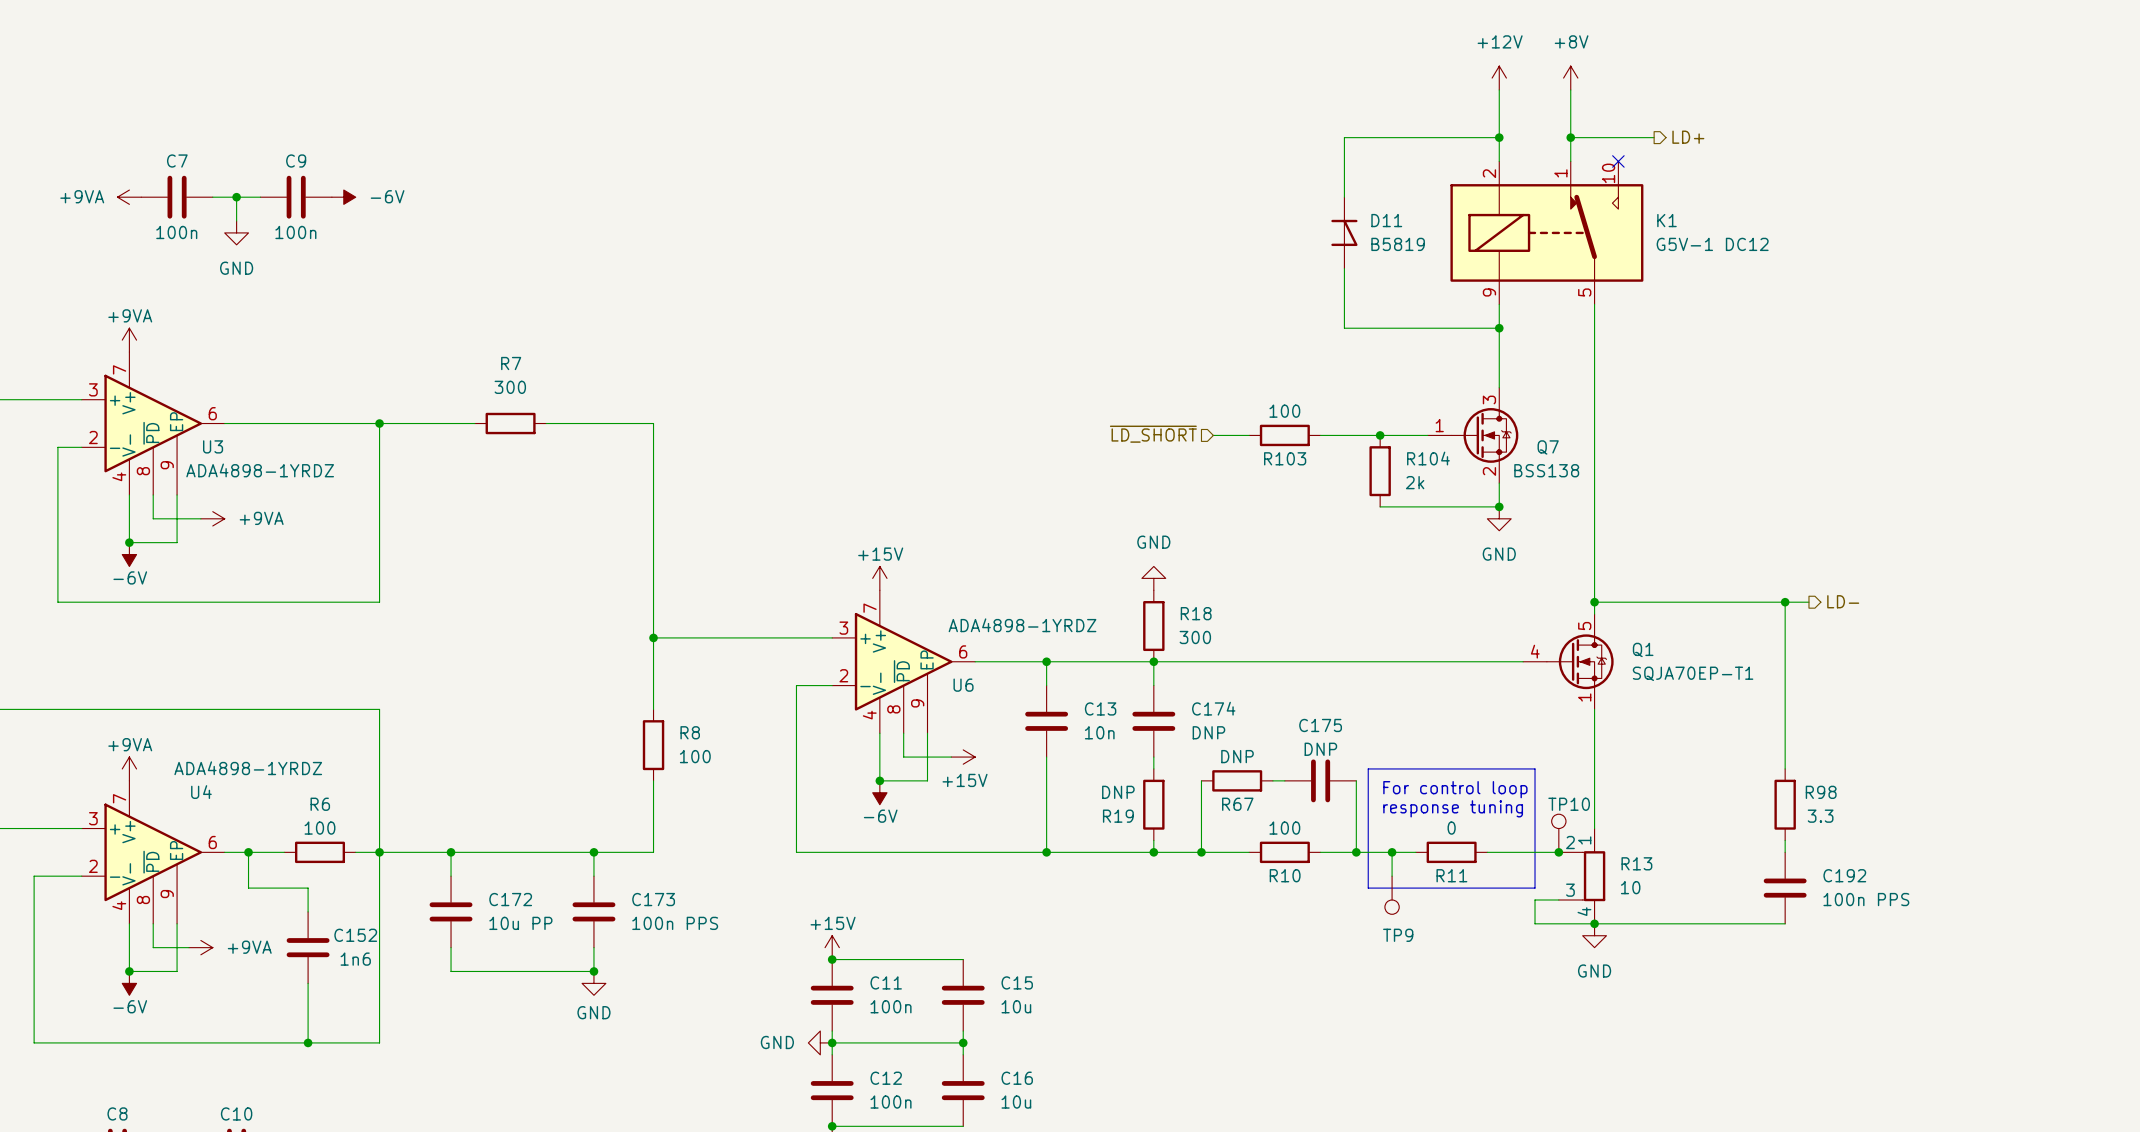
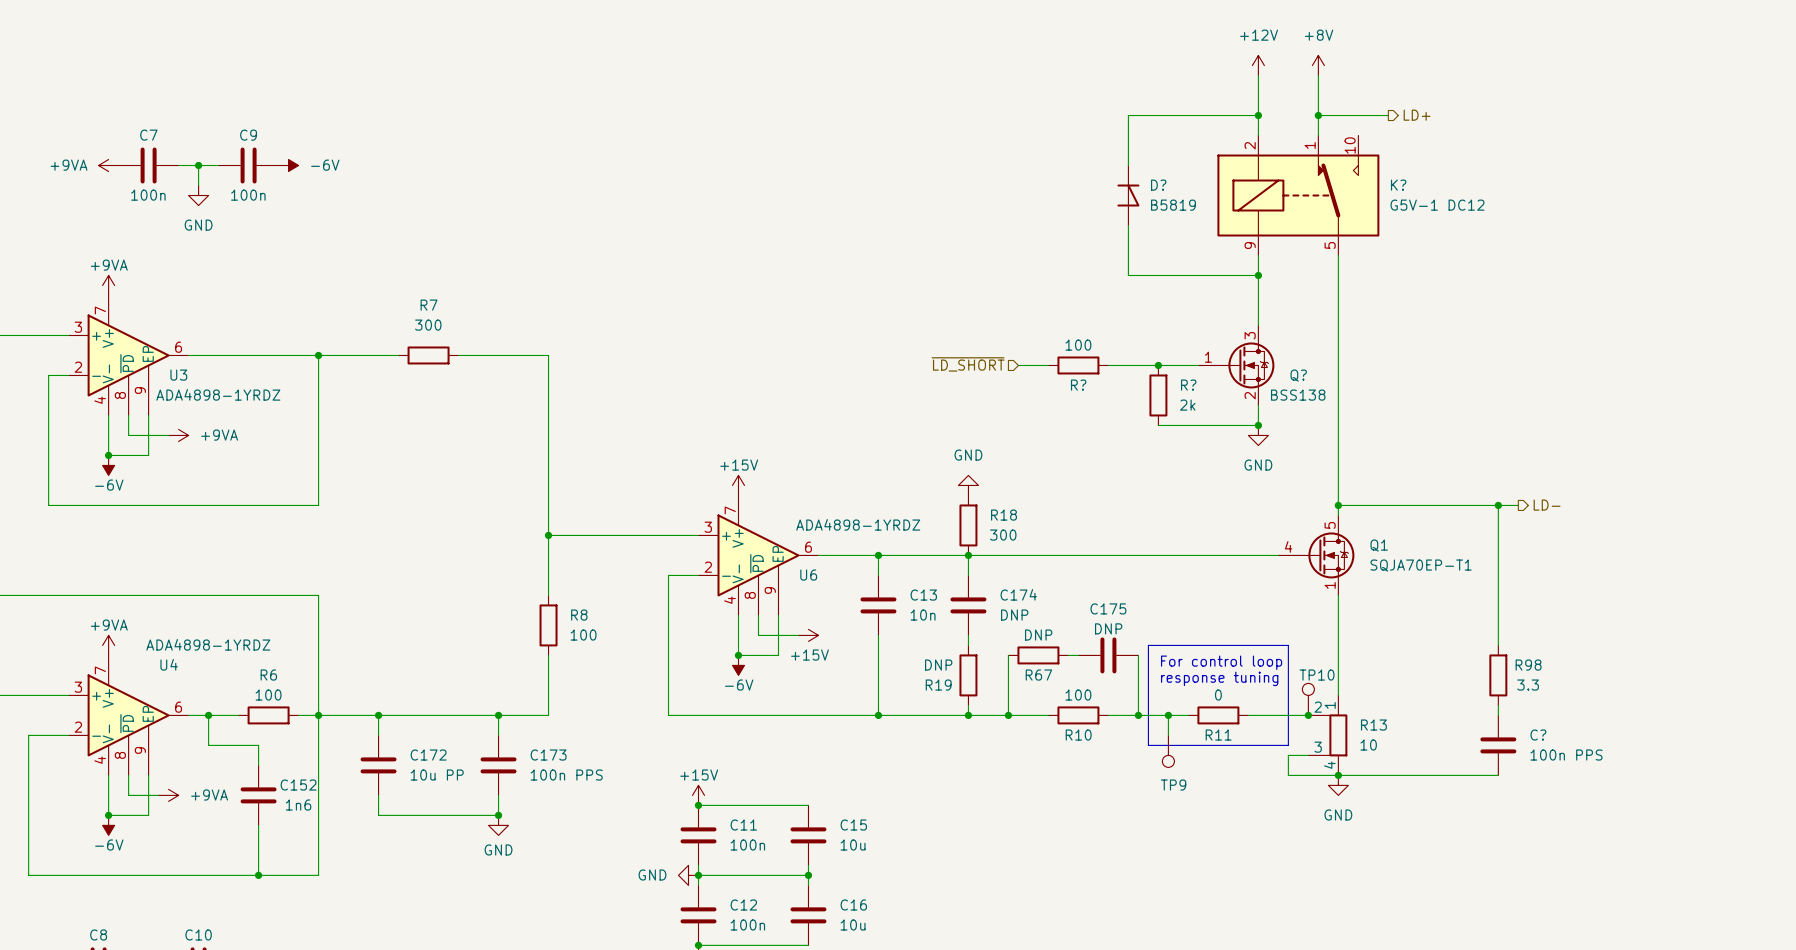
no-connect mark: (1618, 161) -> none
D11 name: D11 (1386, 220) -> D? (1158, 185)
K1 name: K1 (1666, 220) -> K? (1398, 185)
Q7 name: Q7 (1548, 447) -> Q? (1298, 375)
R103 name: R103 (1285, 458) -> R? (1078, 385)
R104 name: R104 (1428, 458) -> R? (1188, 385)
C192 name: C192 (1844, 875) -> C? (1538, 735)

